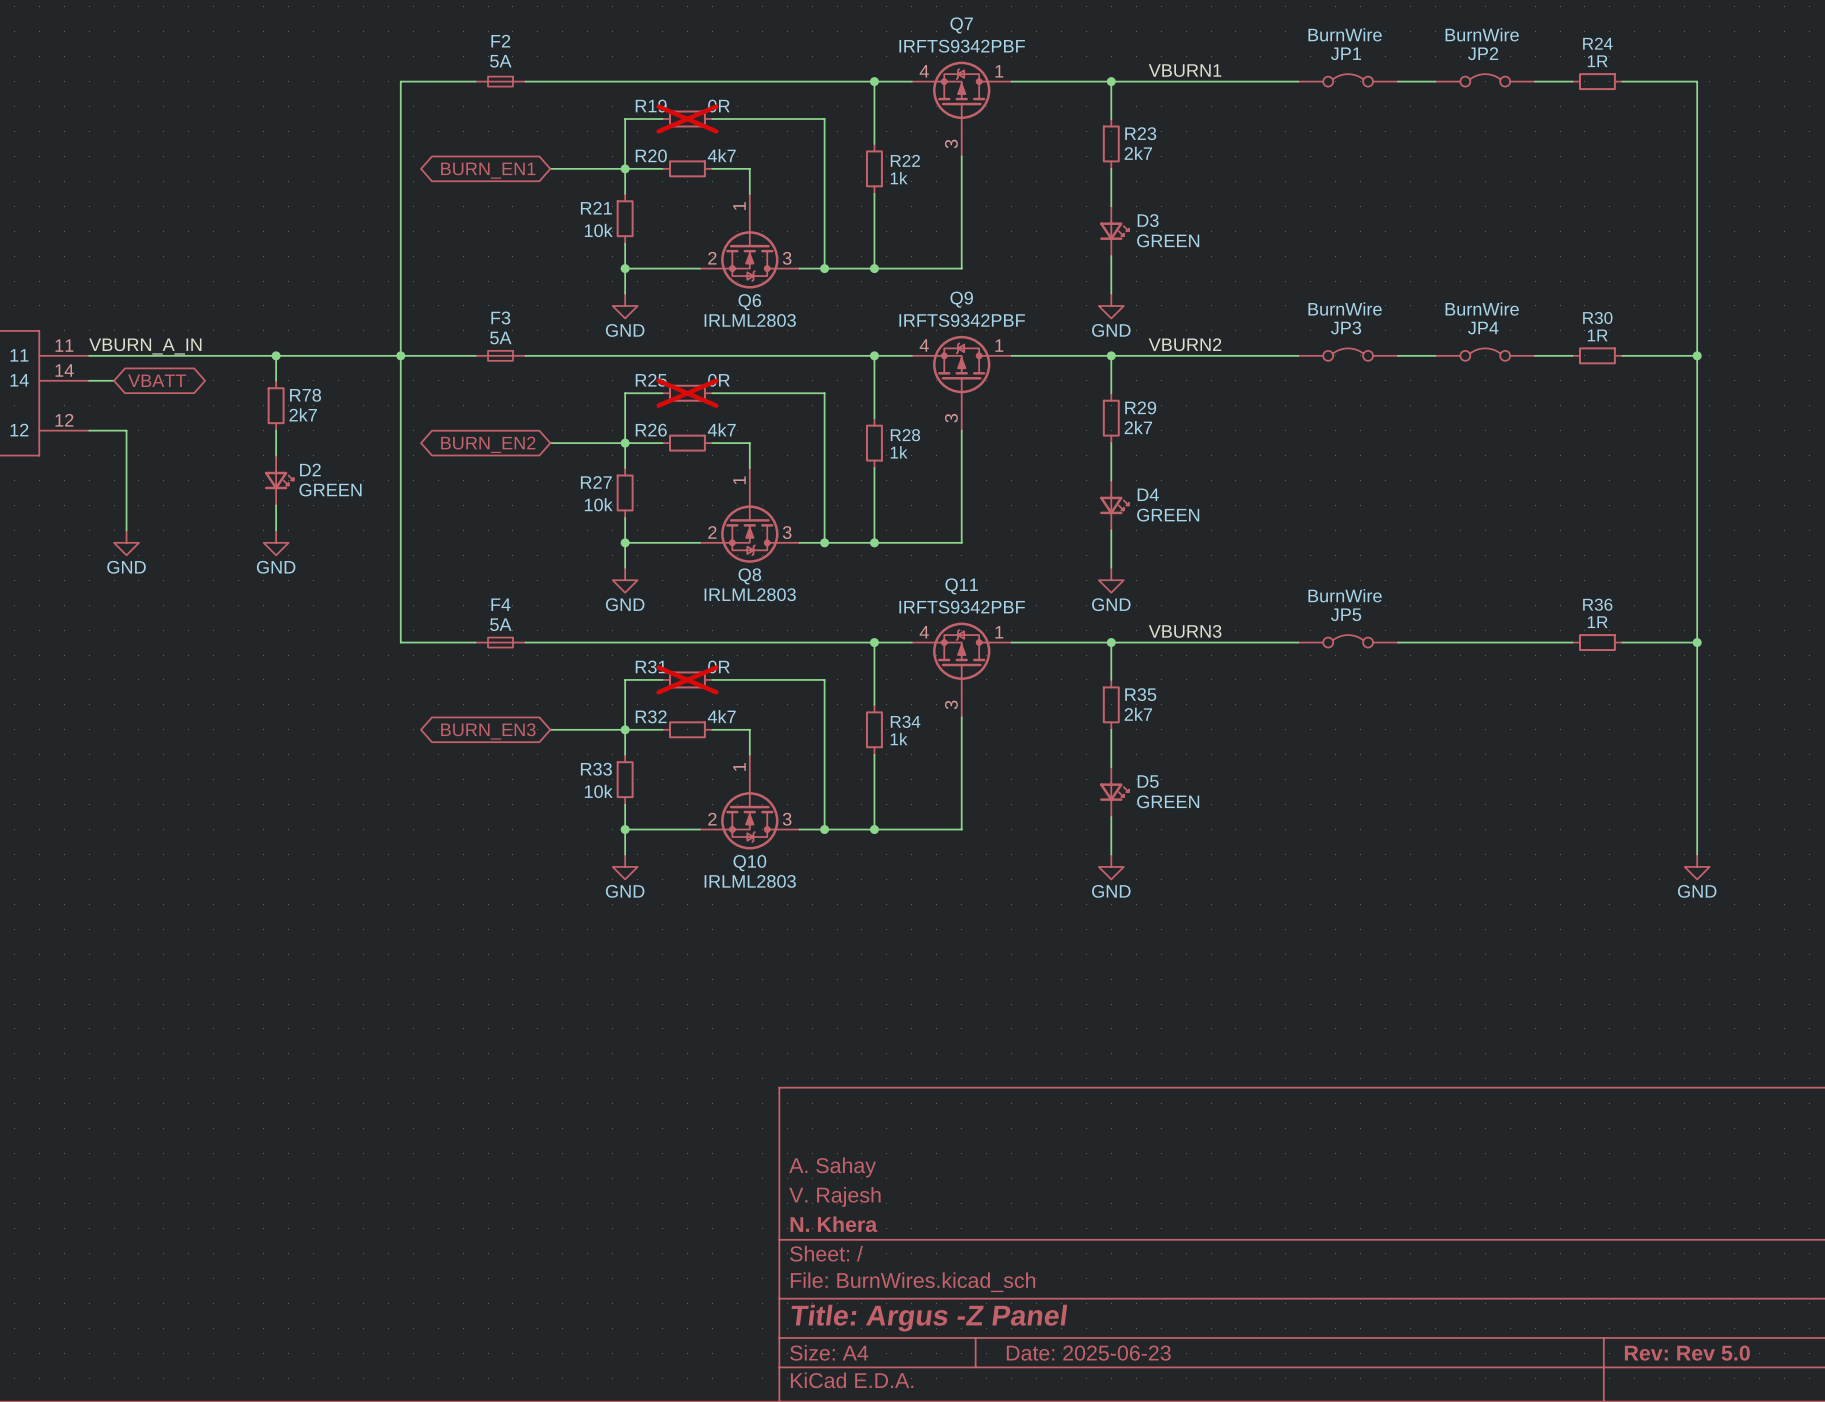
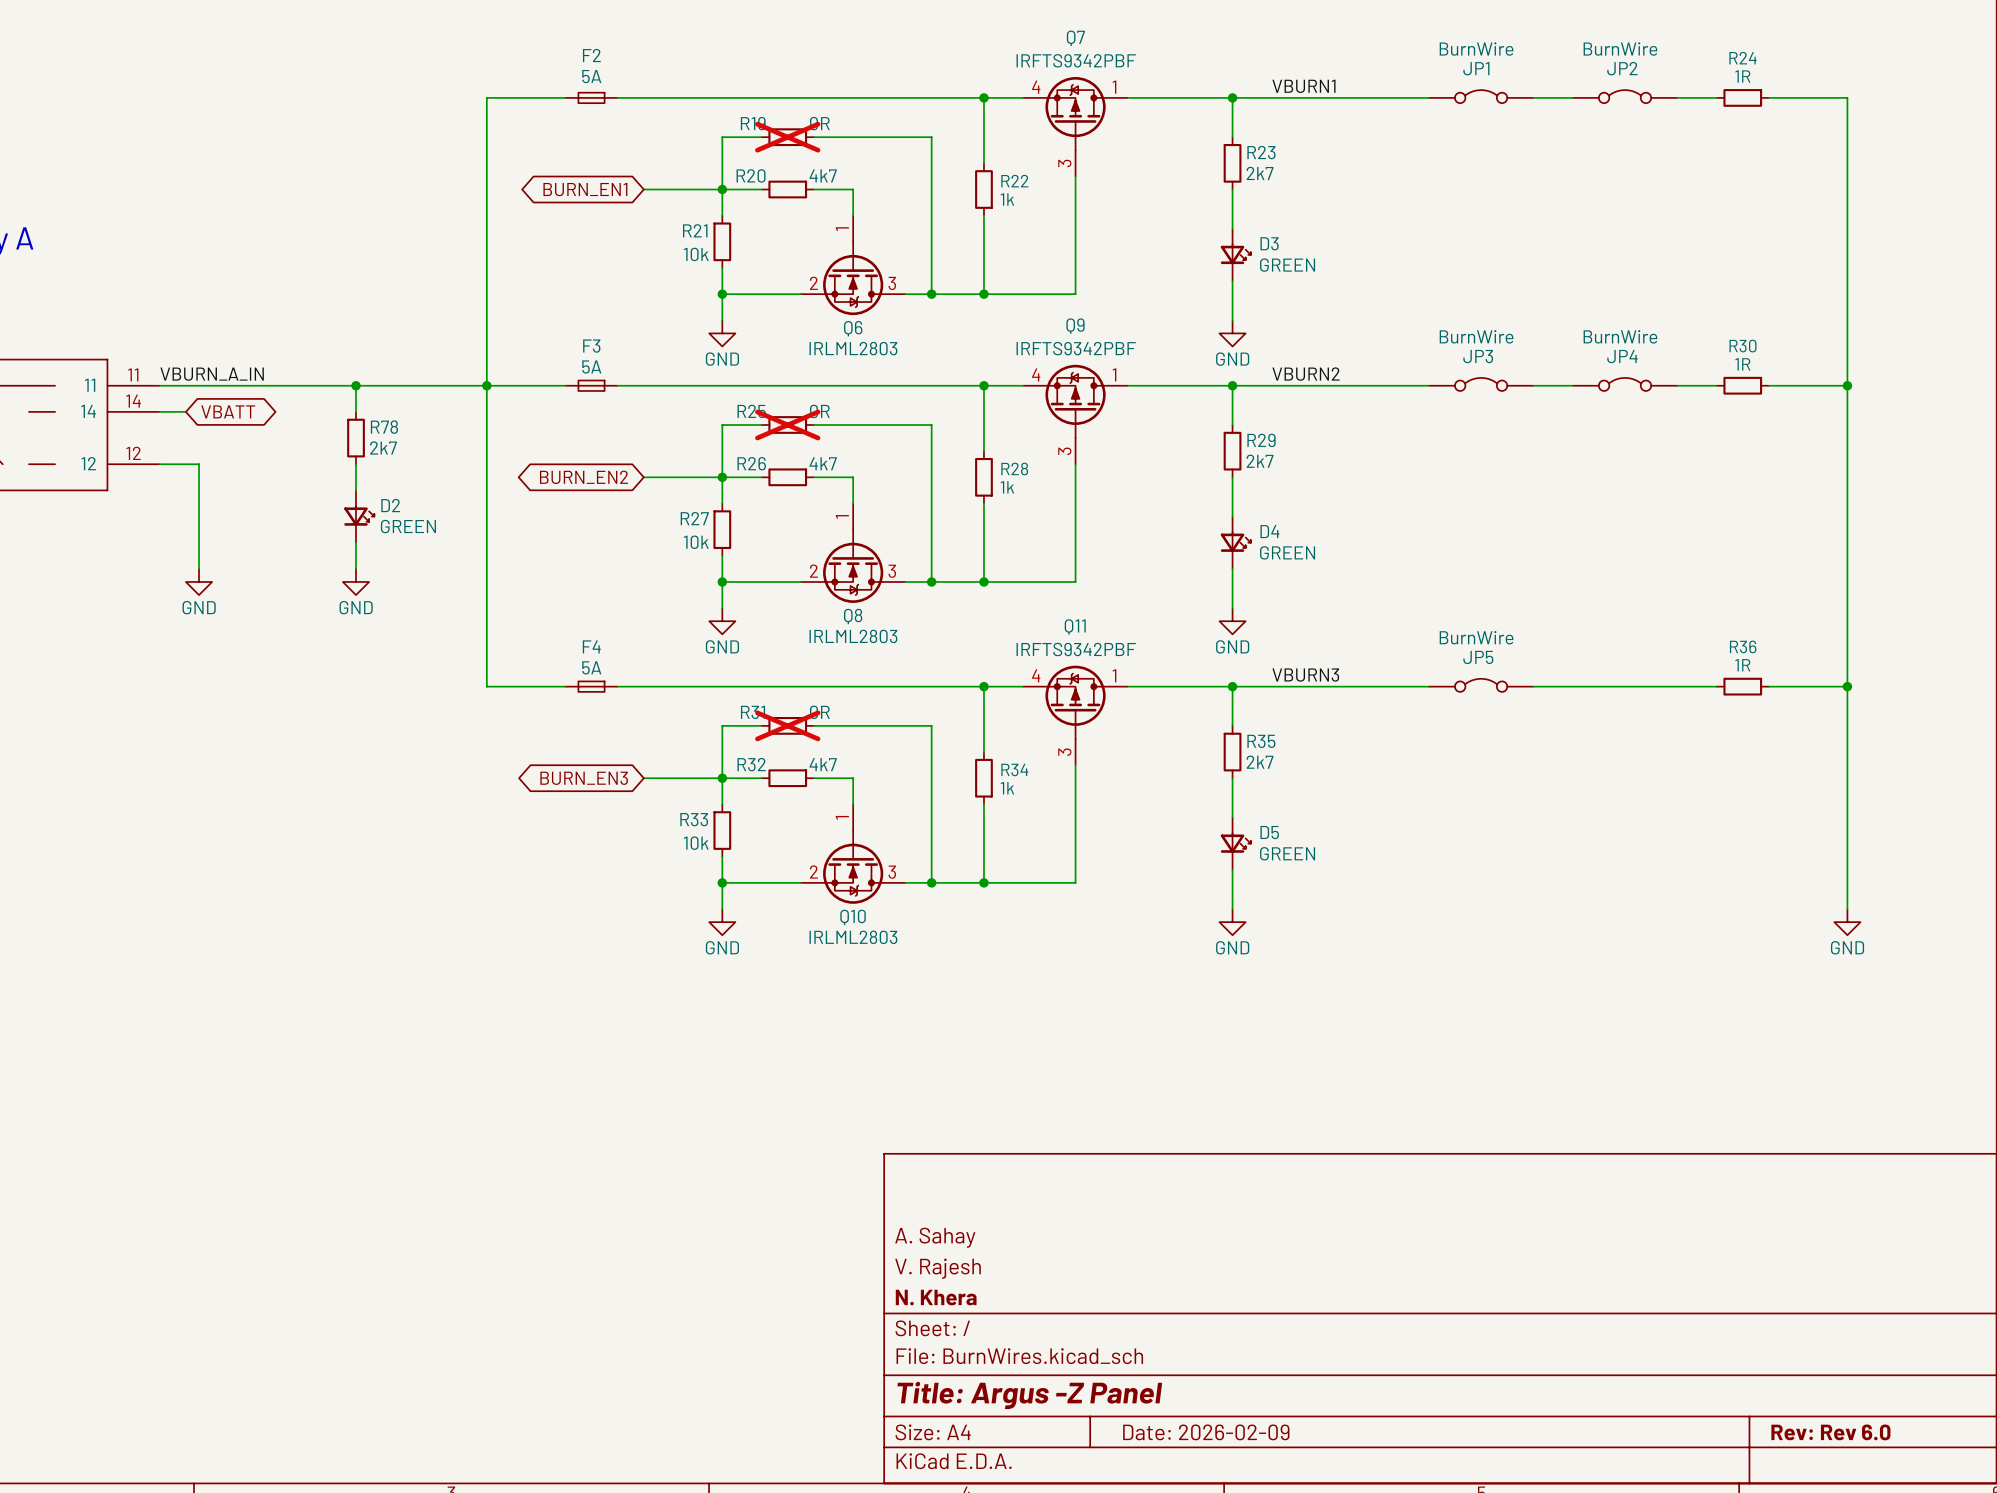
title block: Date: 2025-06-23 (1088, 1353) -> Date: 2026-02-09 (1206, 1432)
title block: Rev: Rev 5.0 (1687, 1353) -> Rev: Rev 6.0 (1830, 1432)

